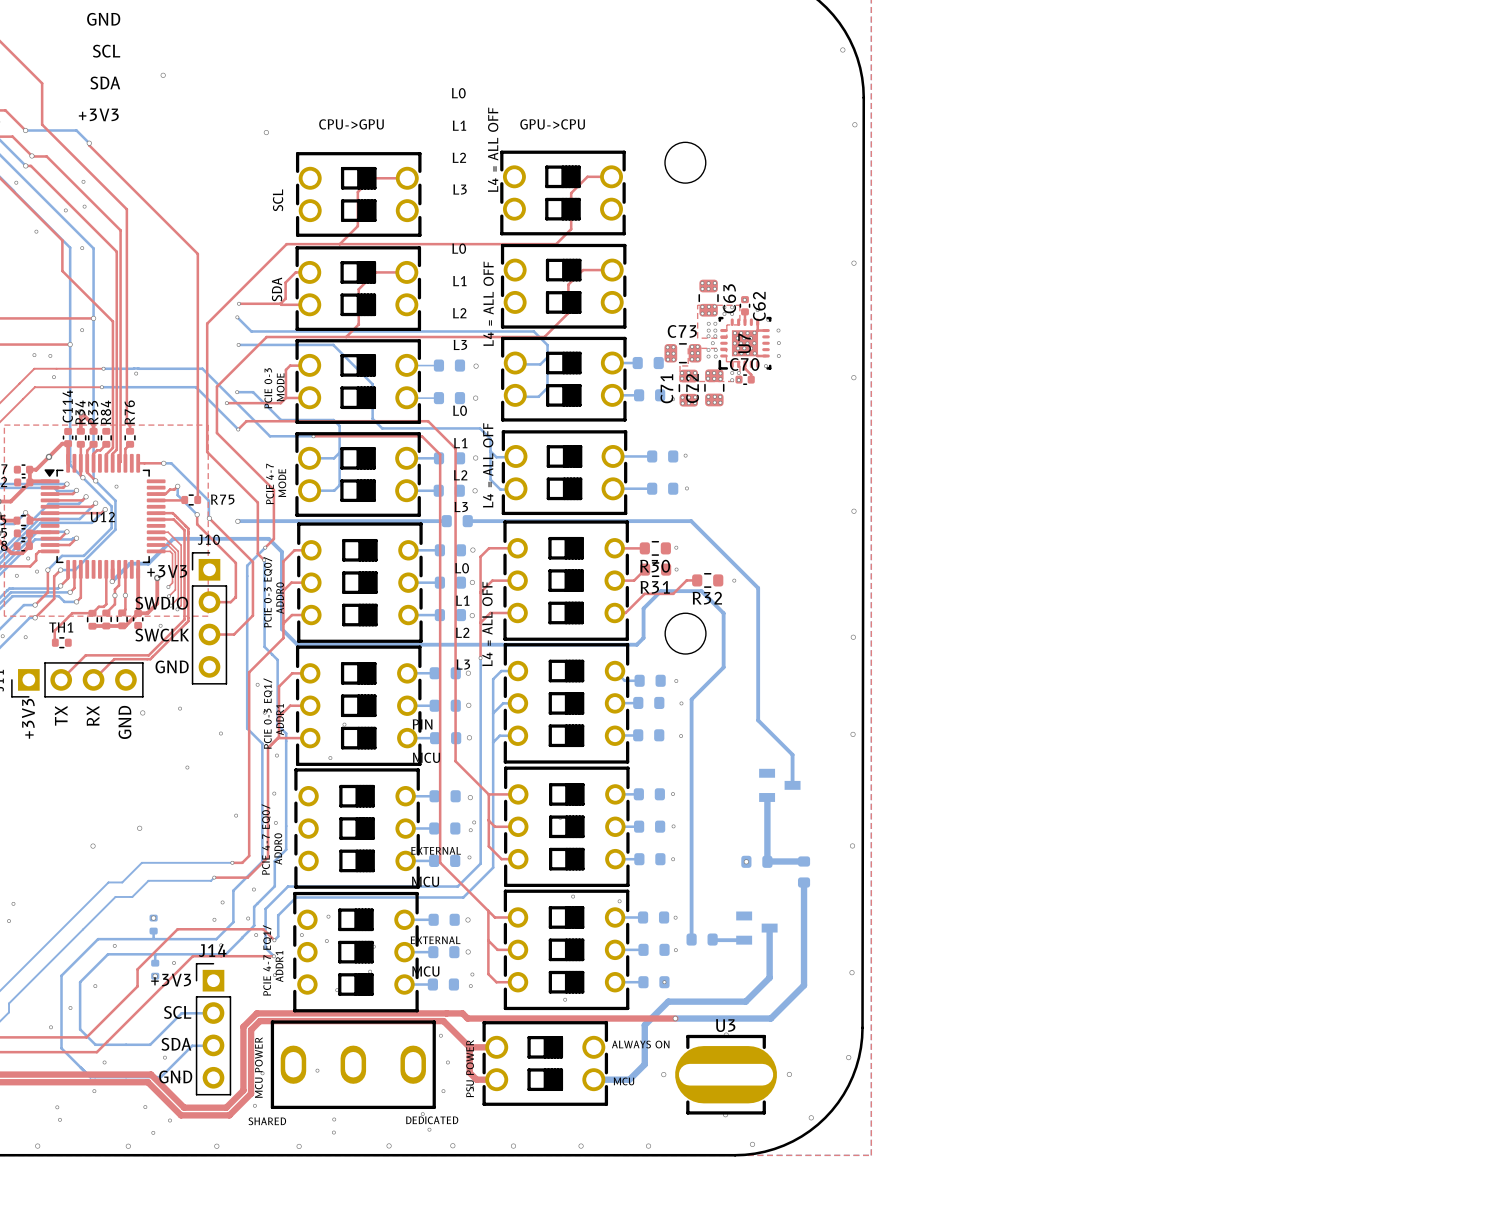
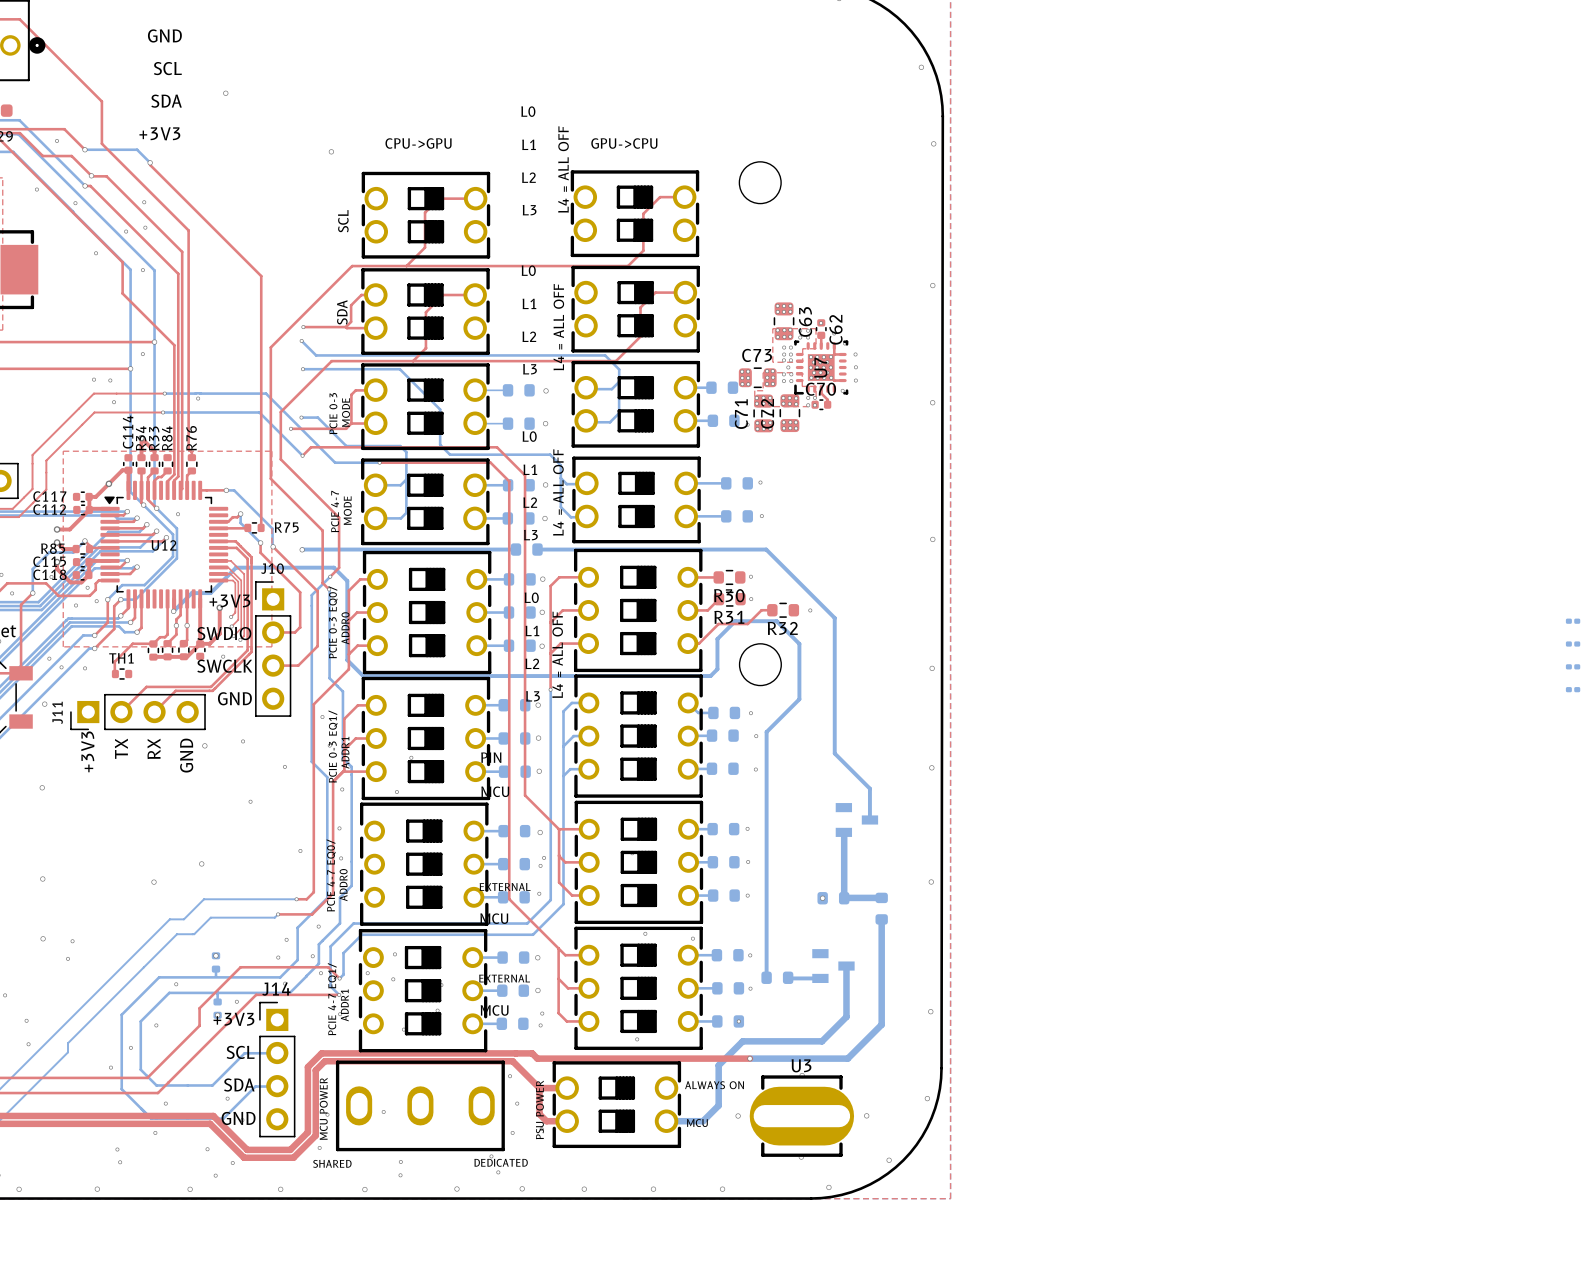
part: none -> (1573, 621)
part: none -> (1573, 644)
part: none -> (1573, 666)
part: none -> (1573, 689)

